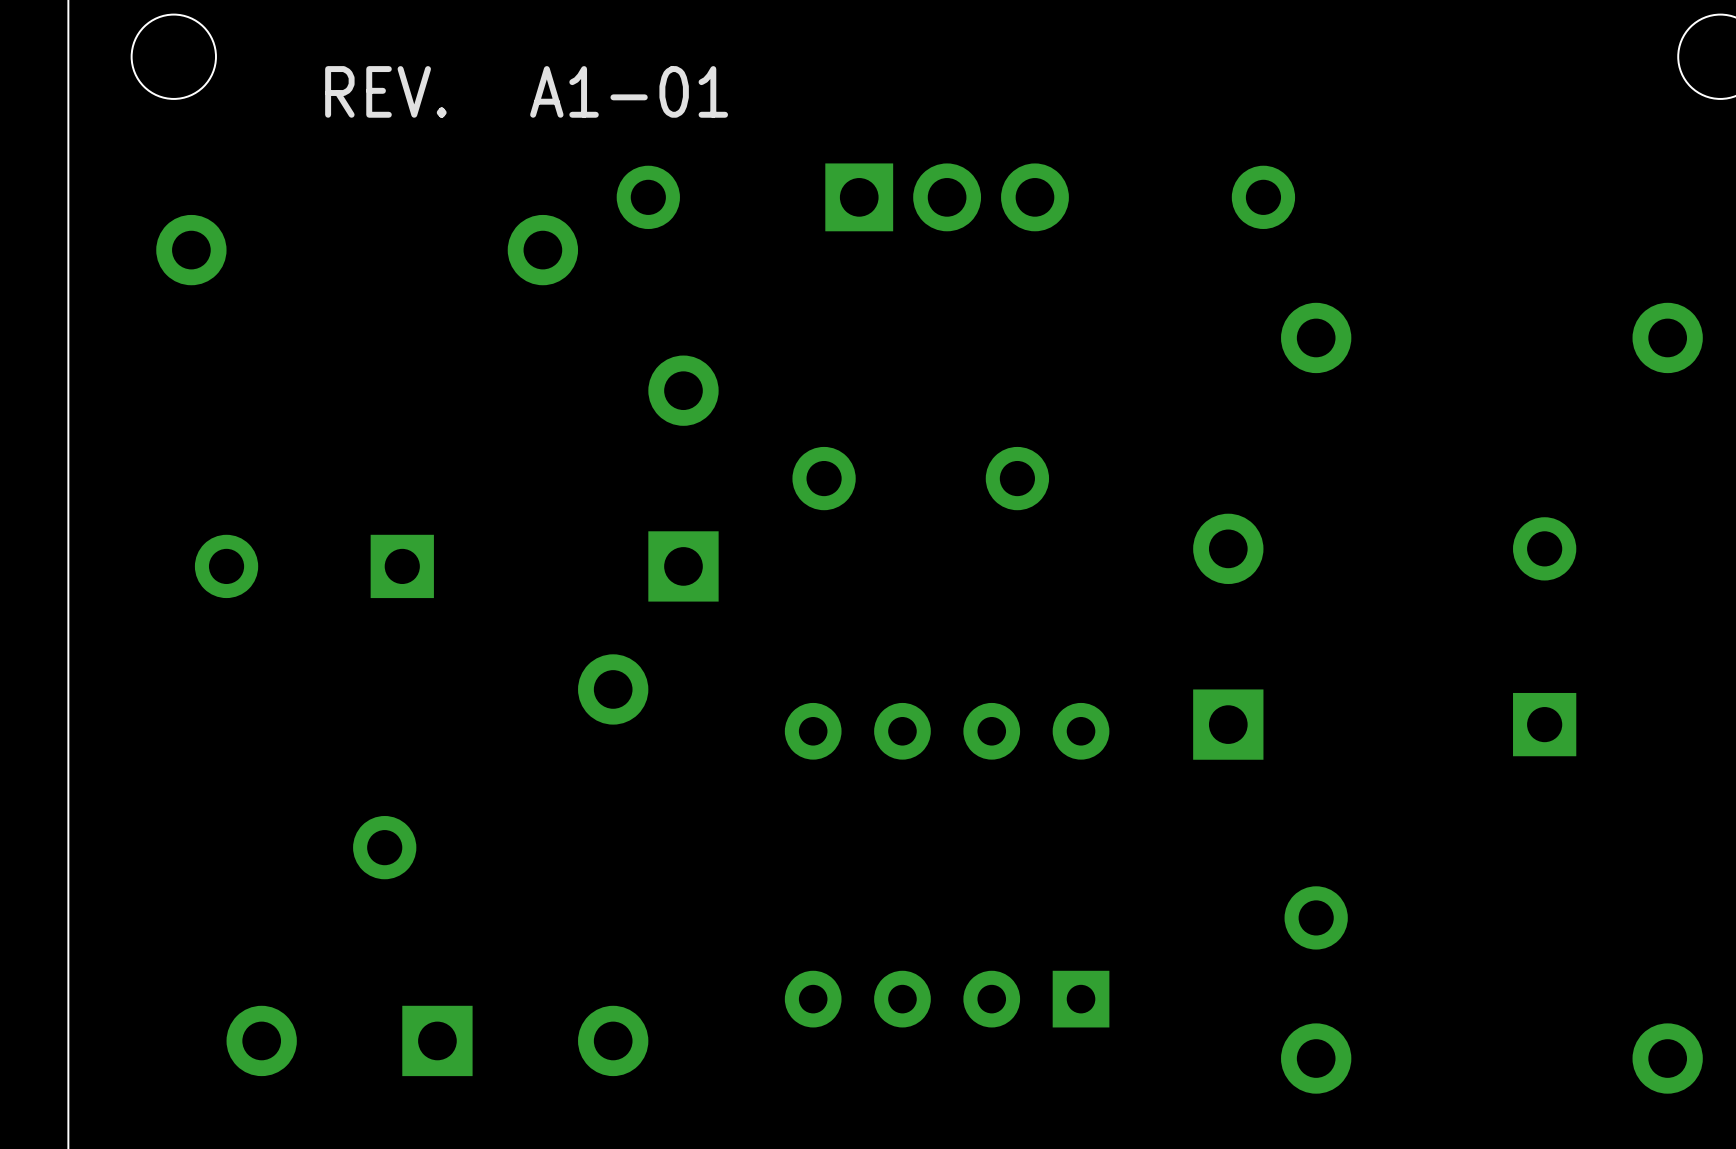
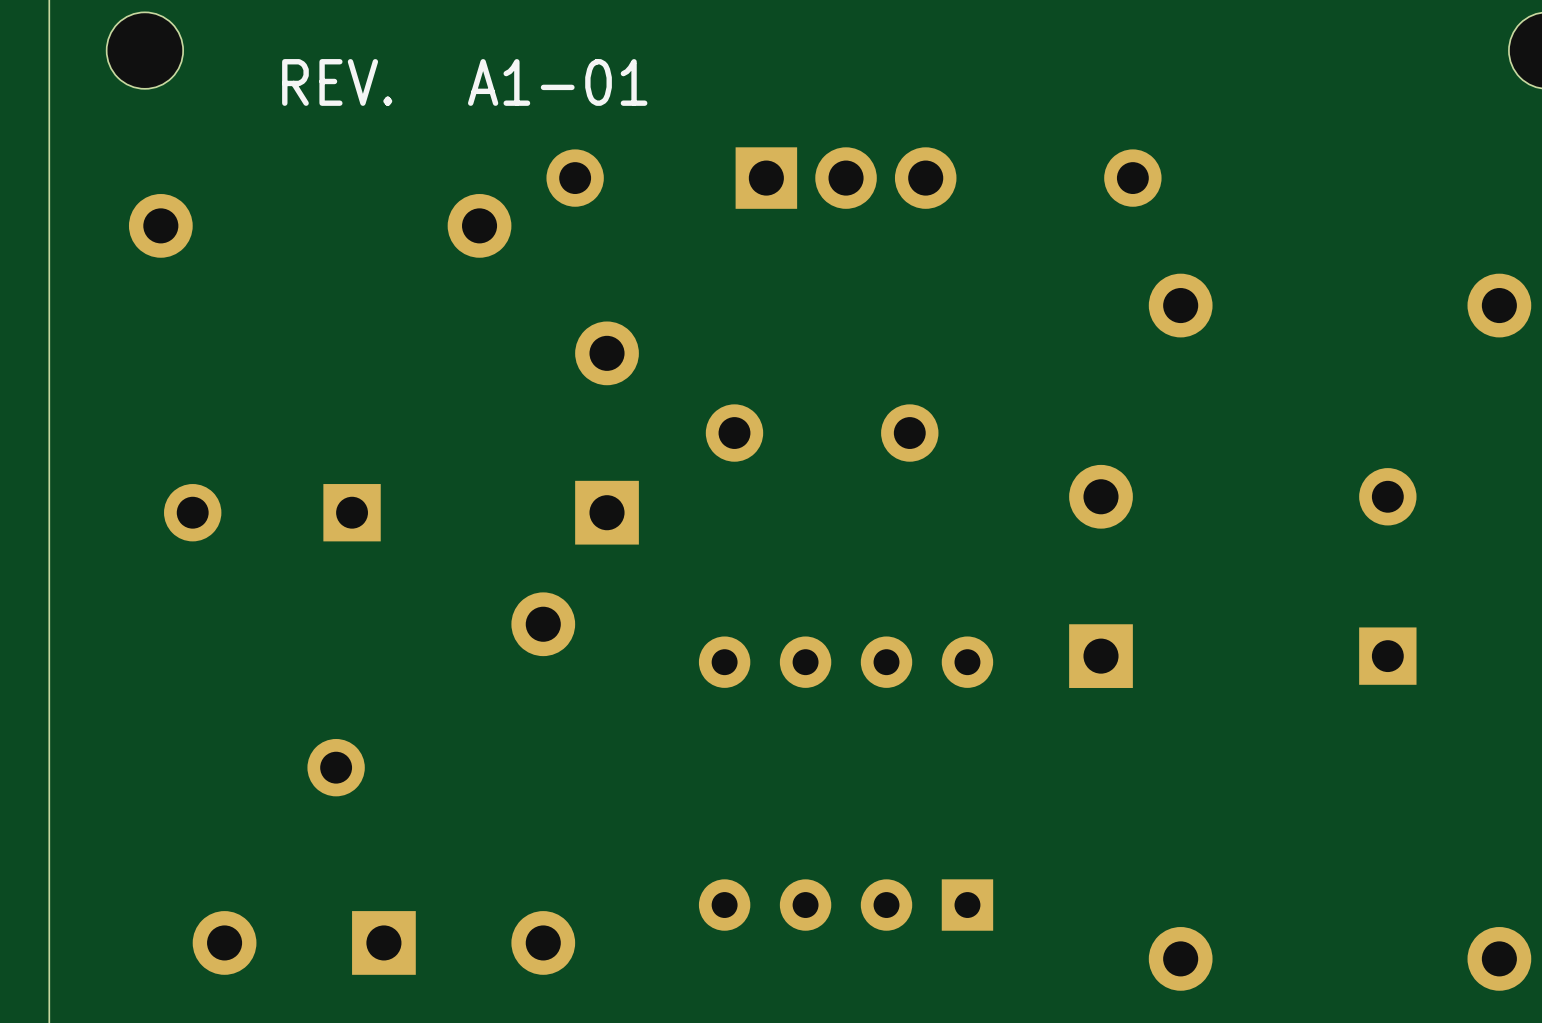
part: (1316, 917) -> none

